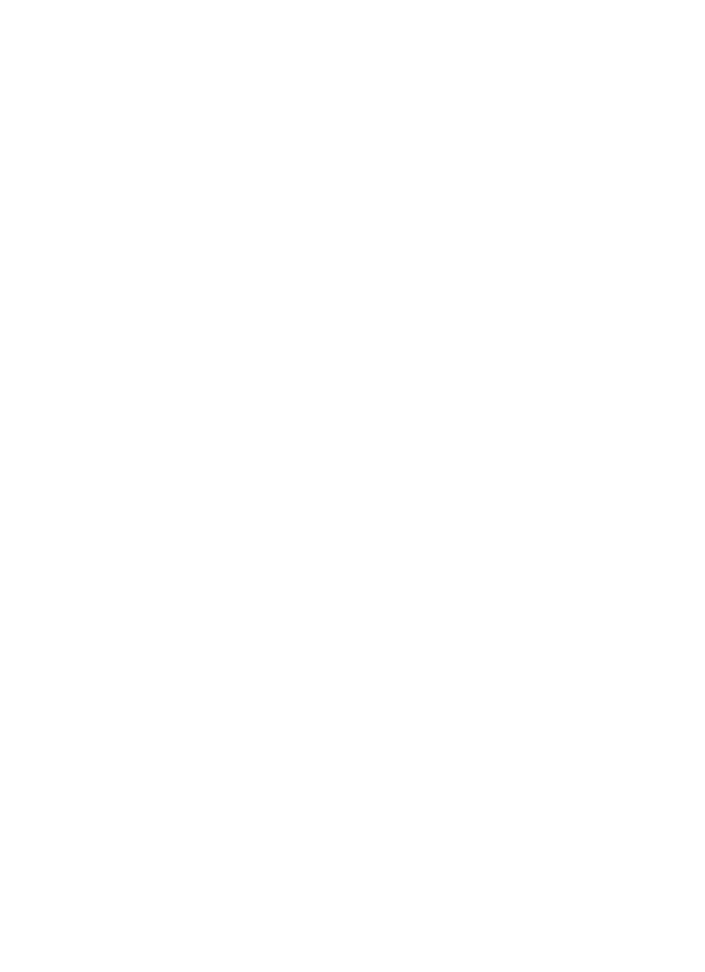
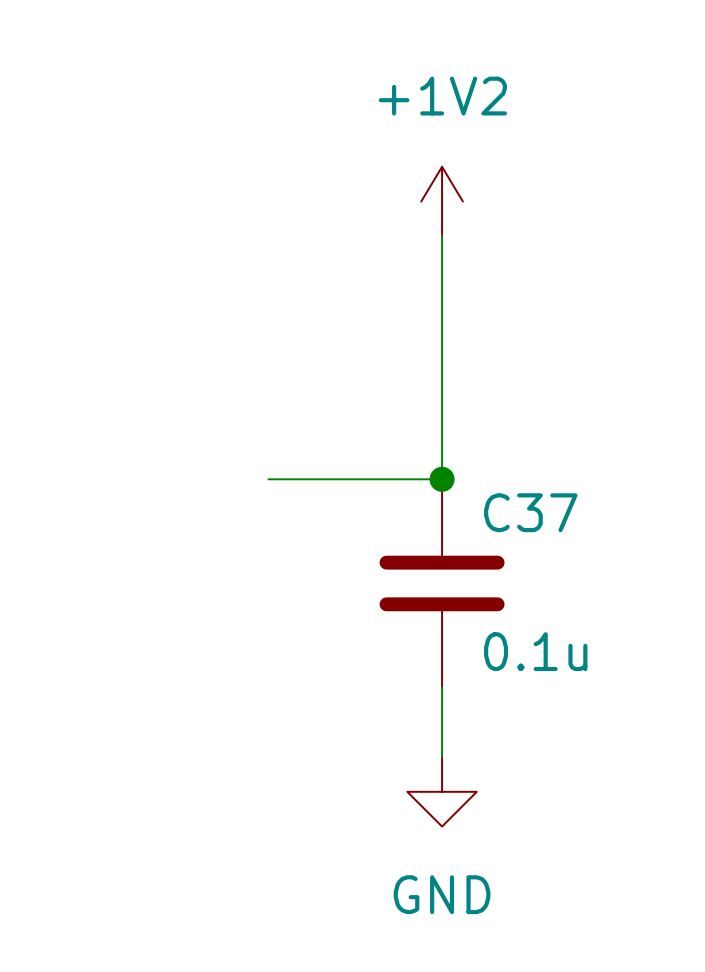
power symbol: none -> +1V2 (442, 201)
wire: none -> (442, 236) (442, 479) (268, 479)
junction: none -> (442, 479)
C37: none -> 0.1u (442, 583)
wire: none -> (442, 687) (442, 757)
power symbol: none -> GND (442, 791)

